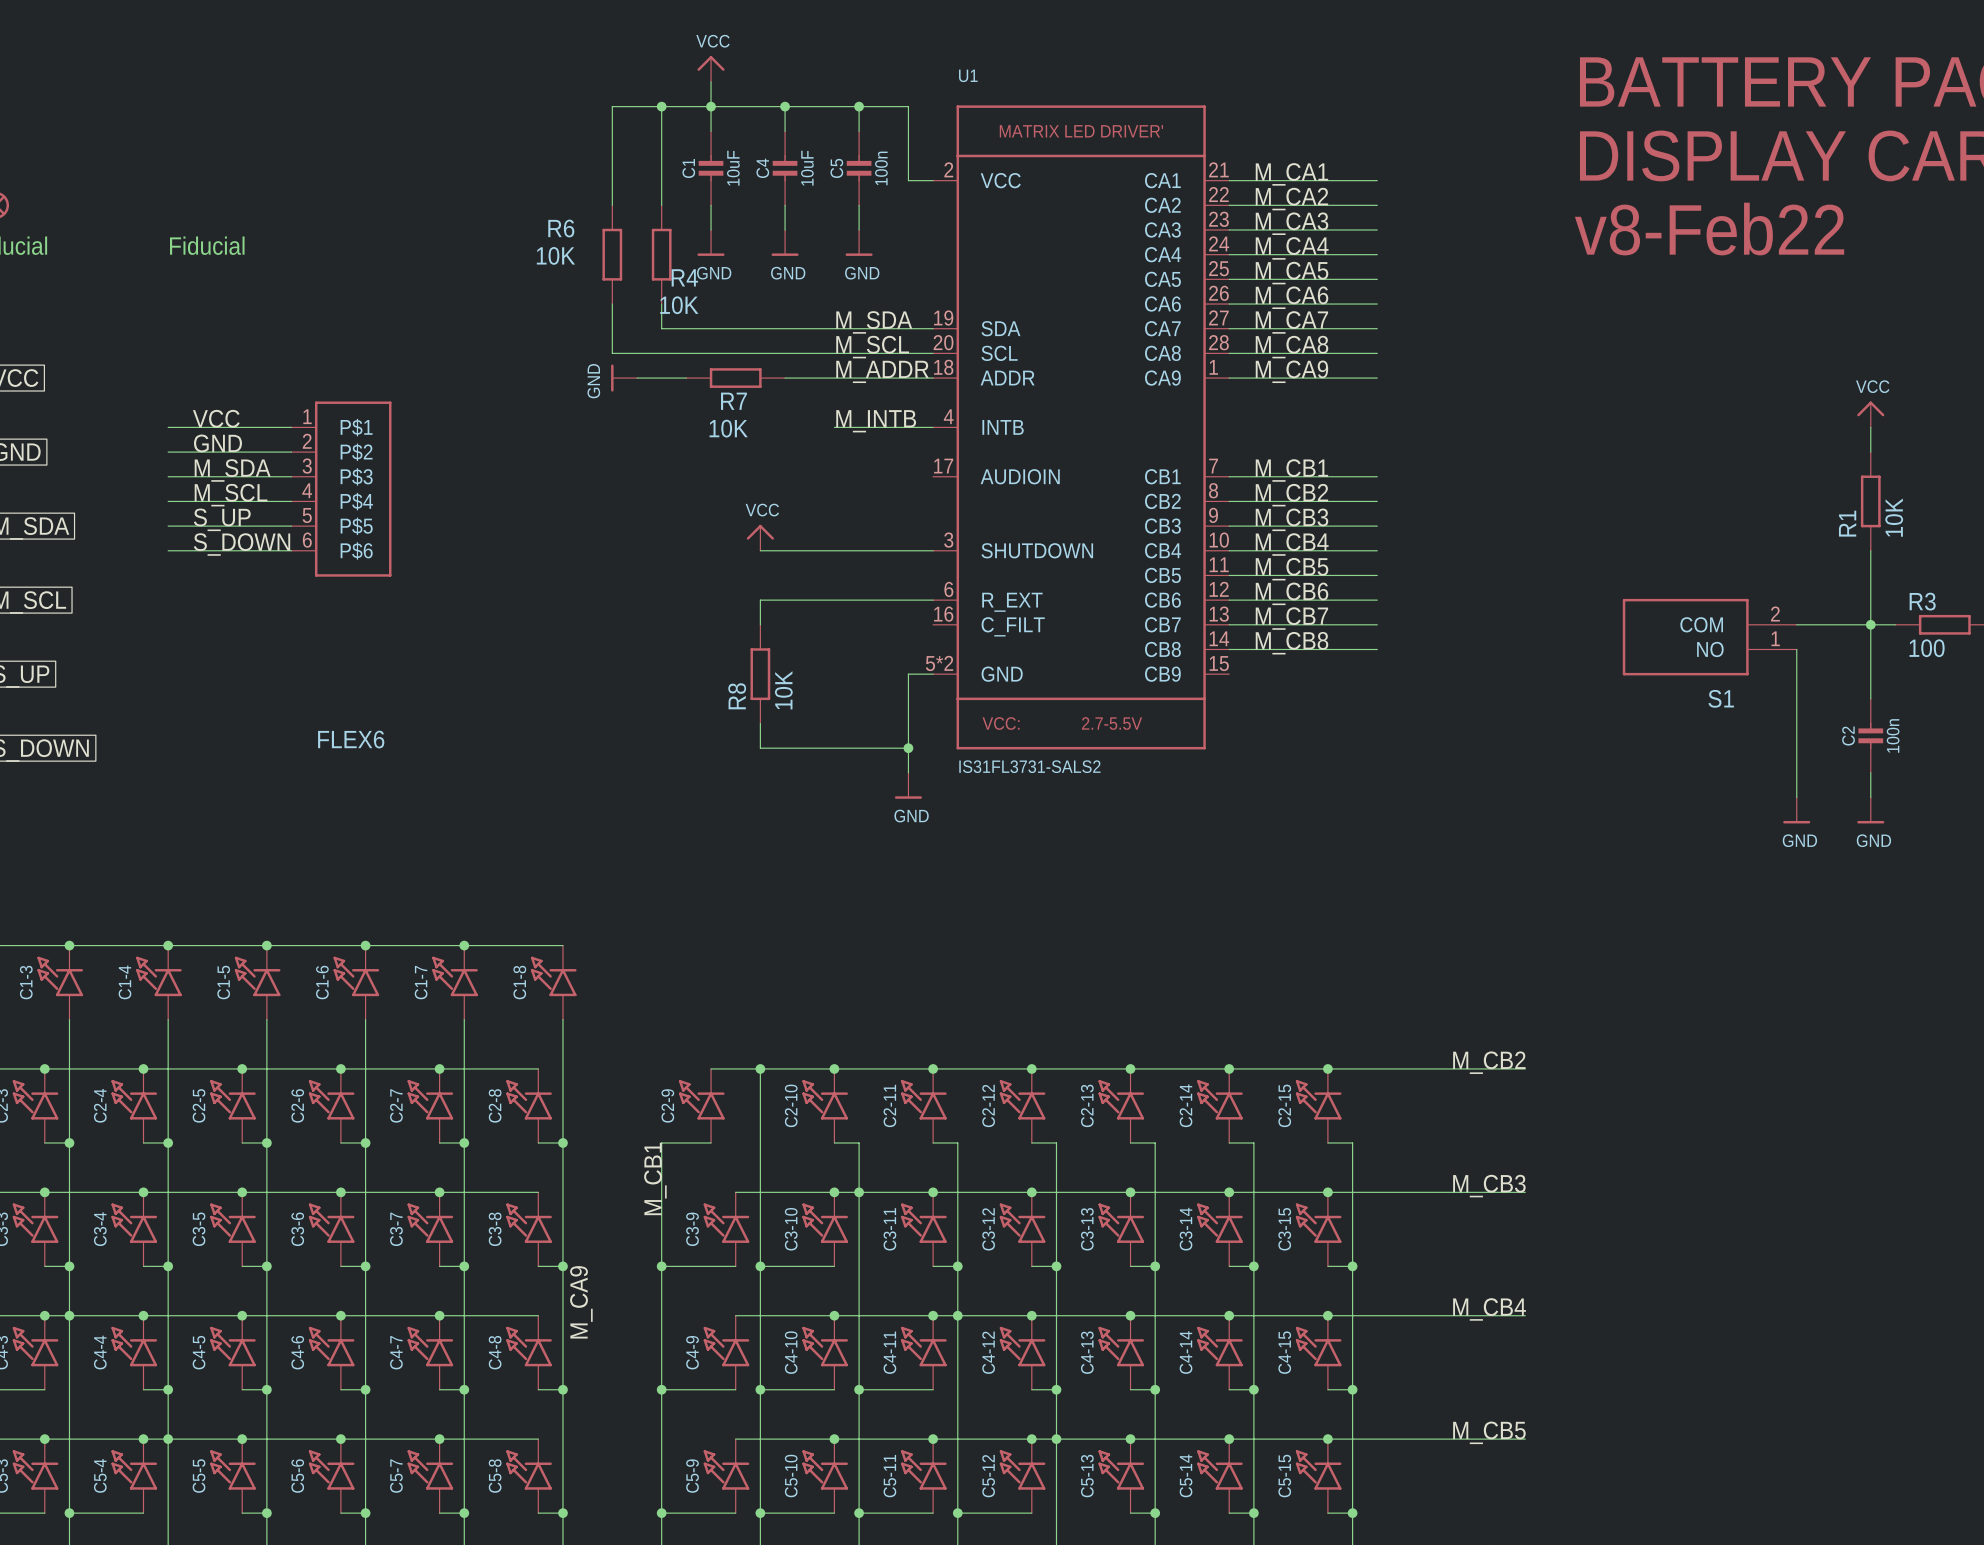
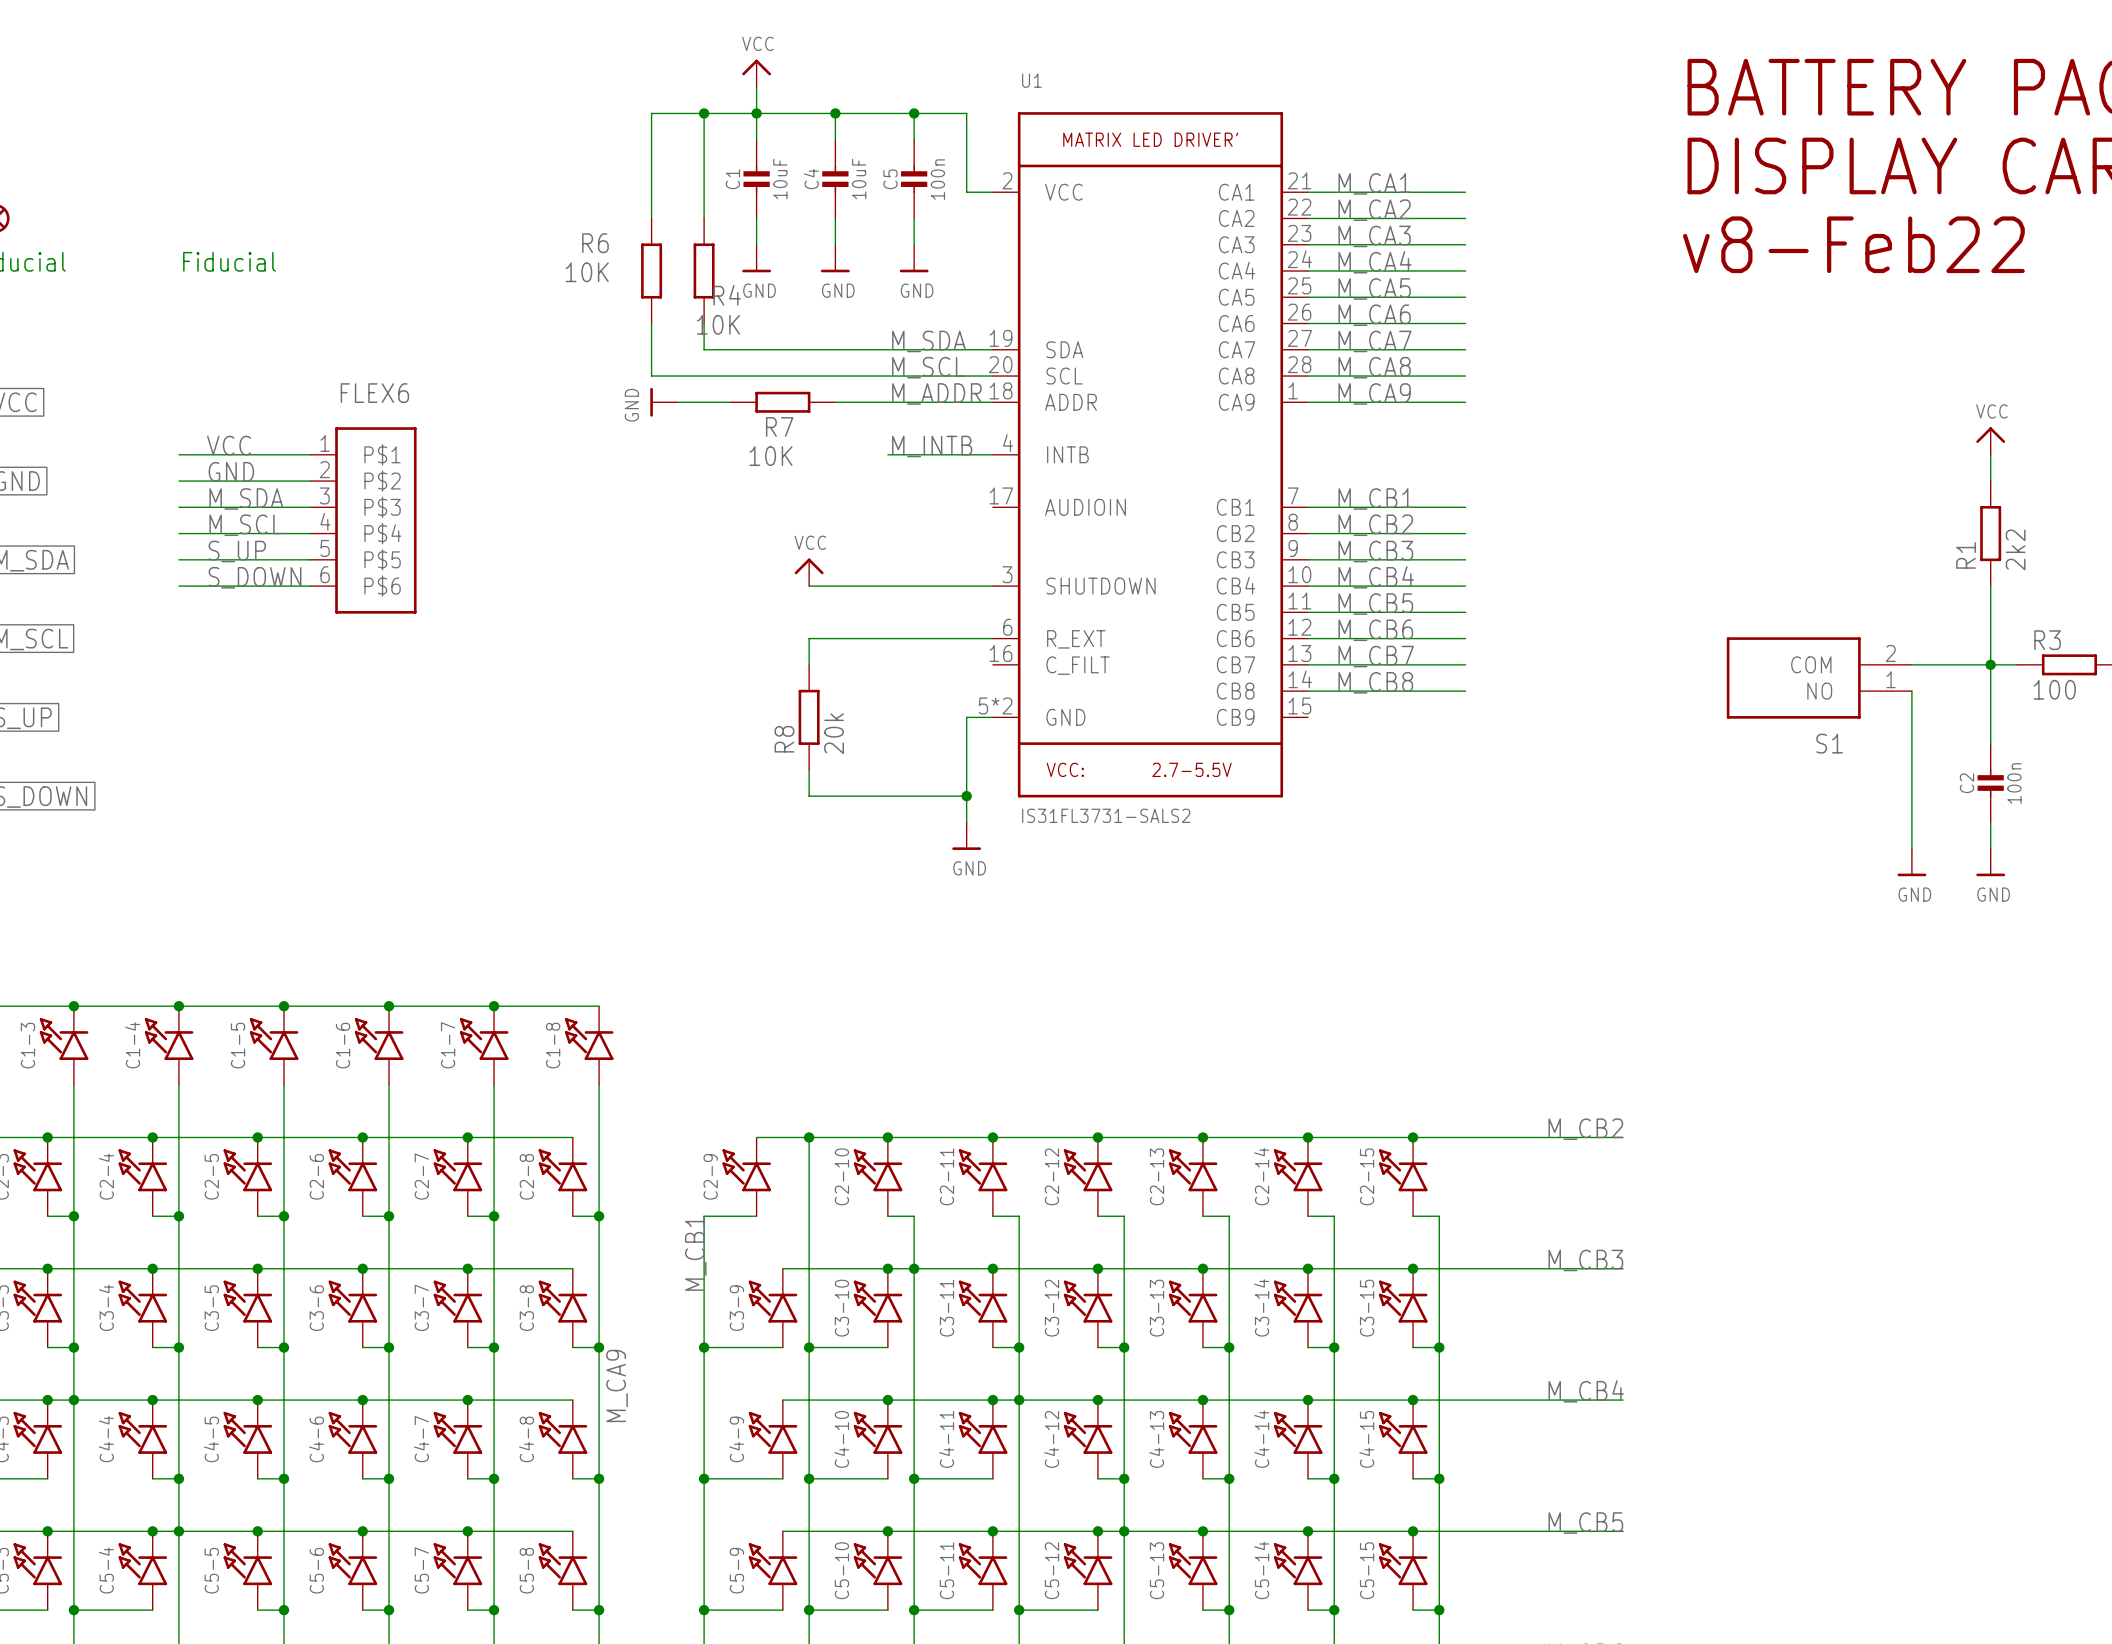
R1 value: 10K (1894, 517) -> 2k2 (2015, 549)
R8 value: 10K (783, 690) -> 20k (834, 733)
part value position: FLEX6 (351, 739) -> FLEX6 (374, 393)

